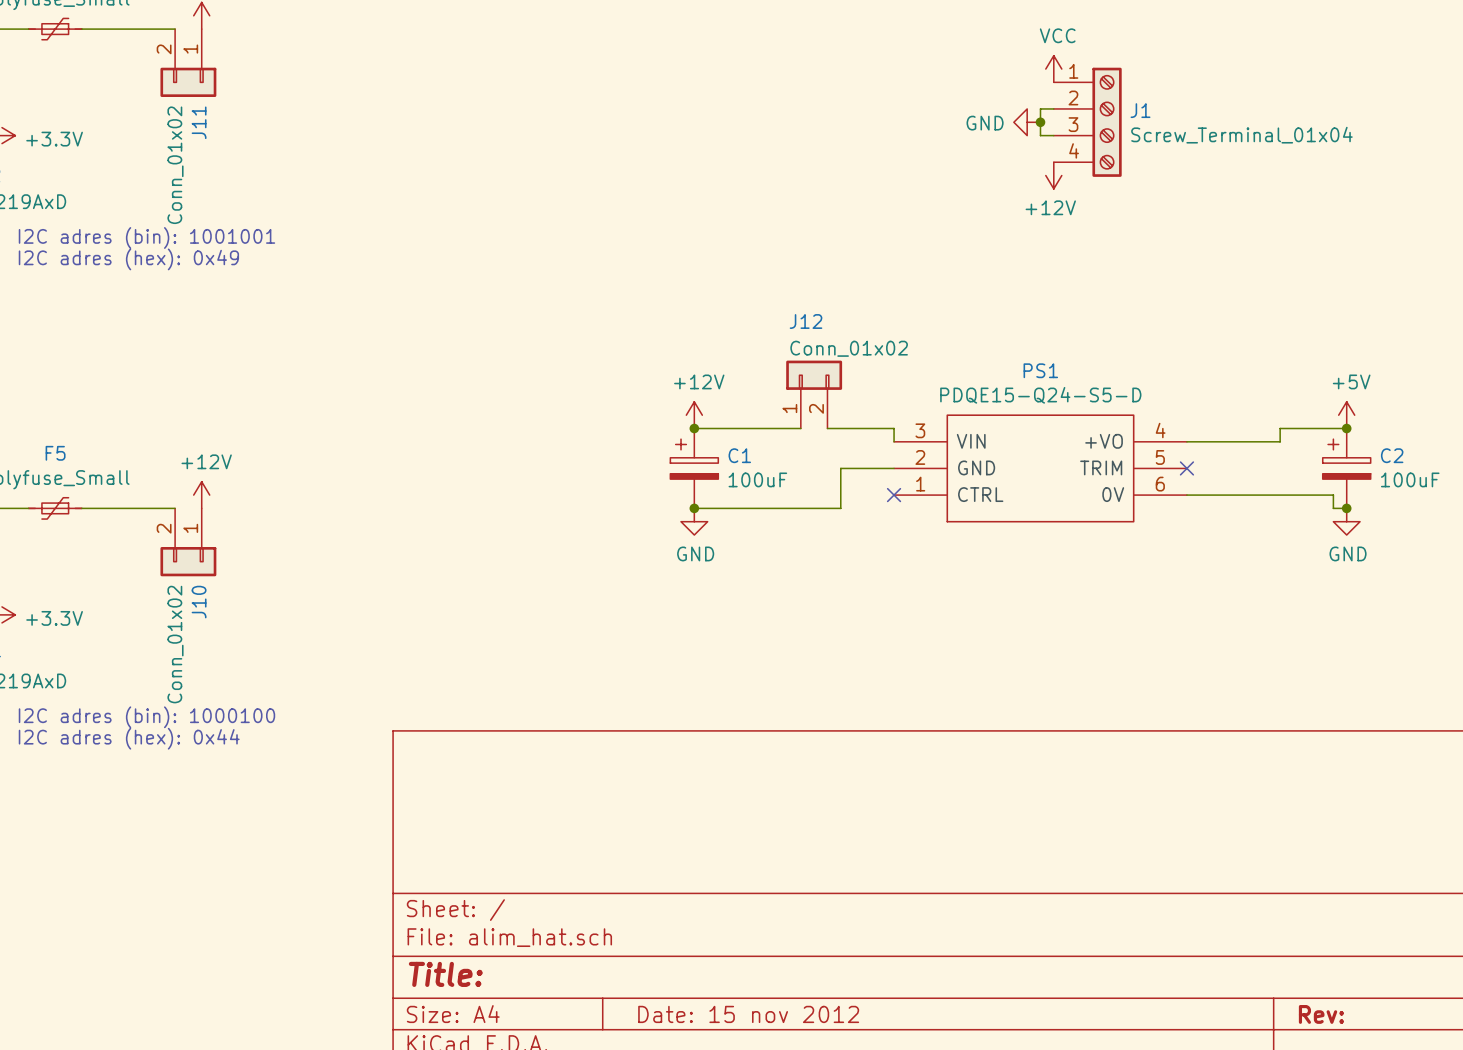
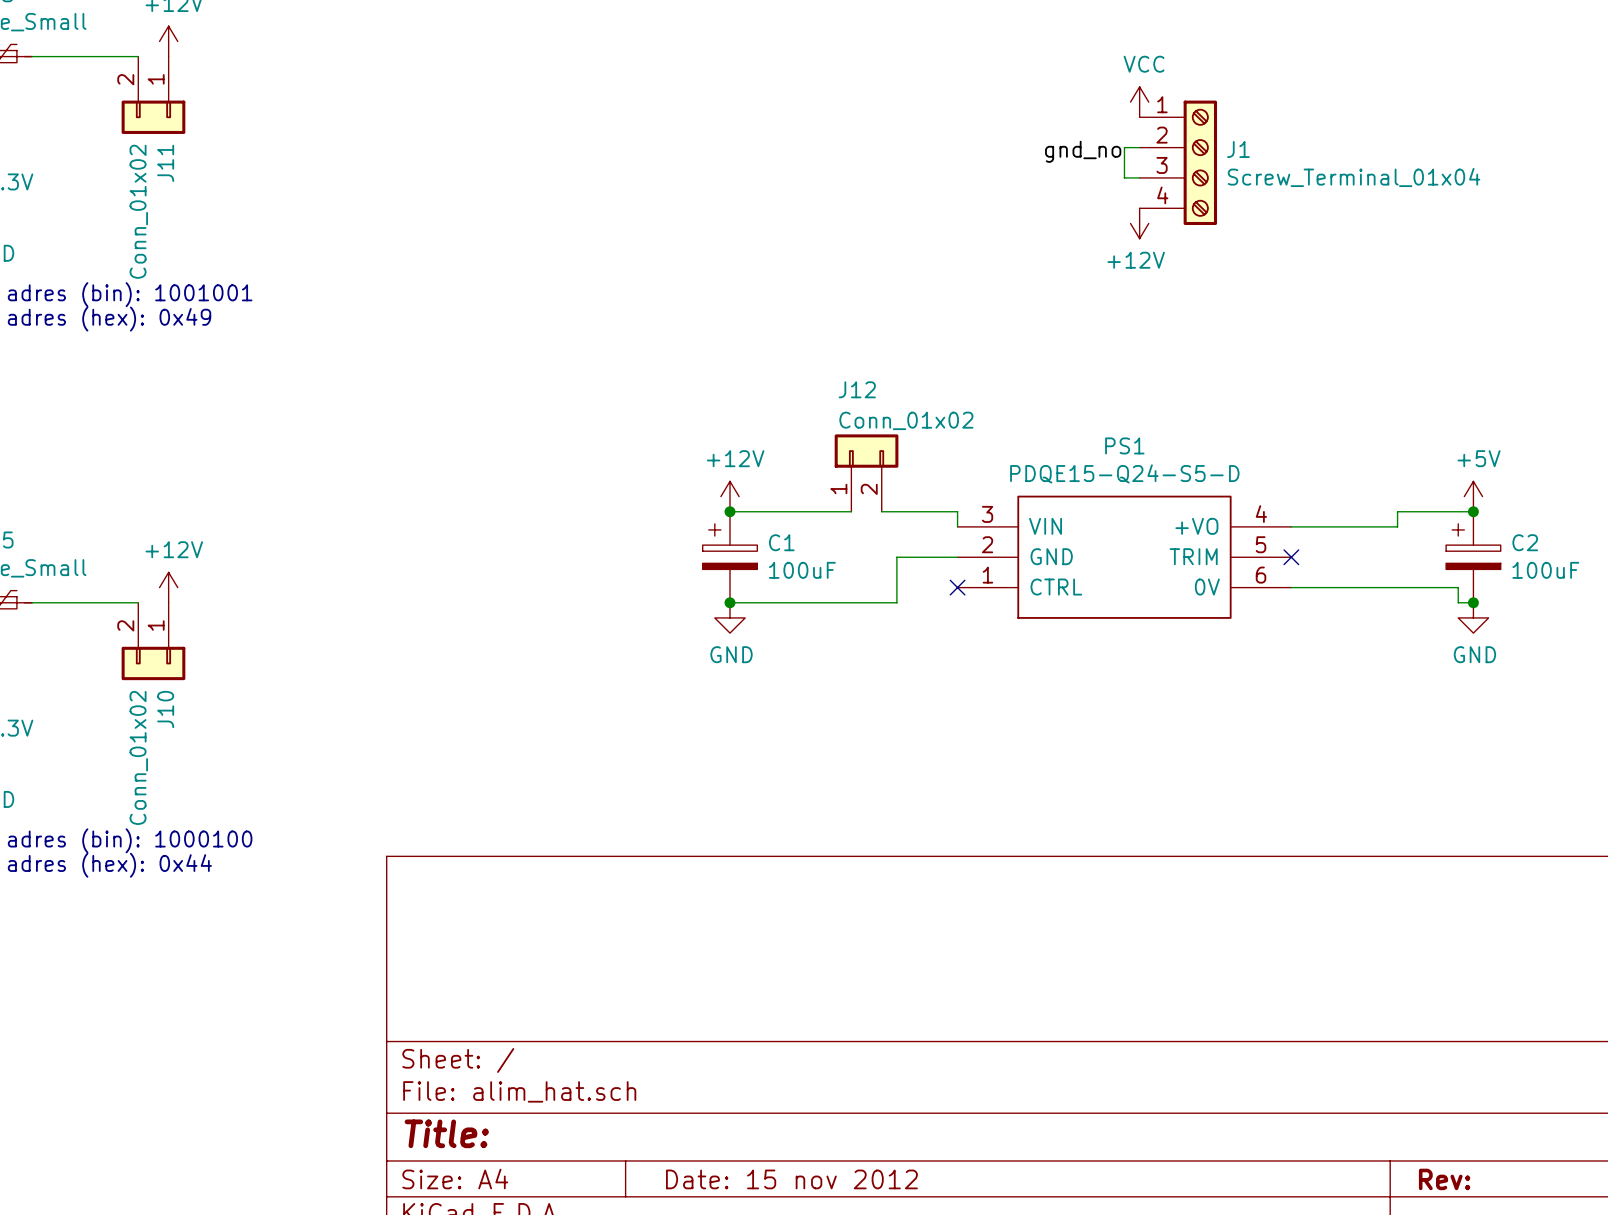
label: none -> gnd_no (1083, 151)
power symbol: GND (1027, 122) -> none
junction: (1040, 122) -> none

